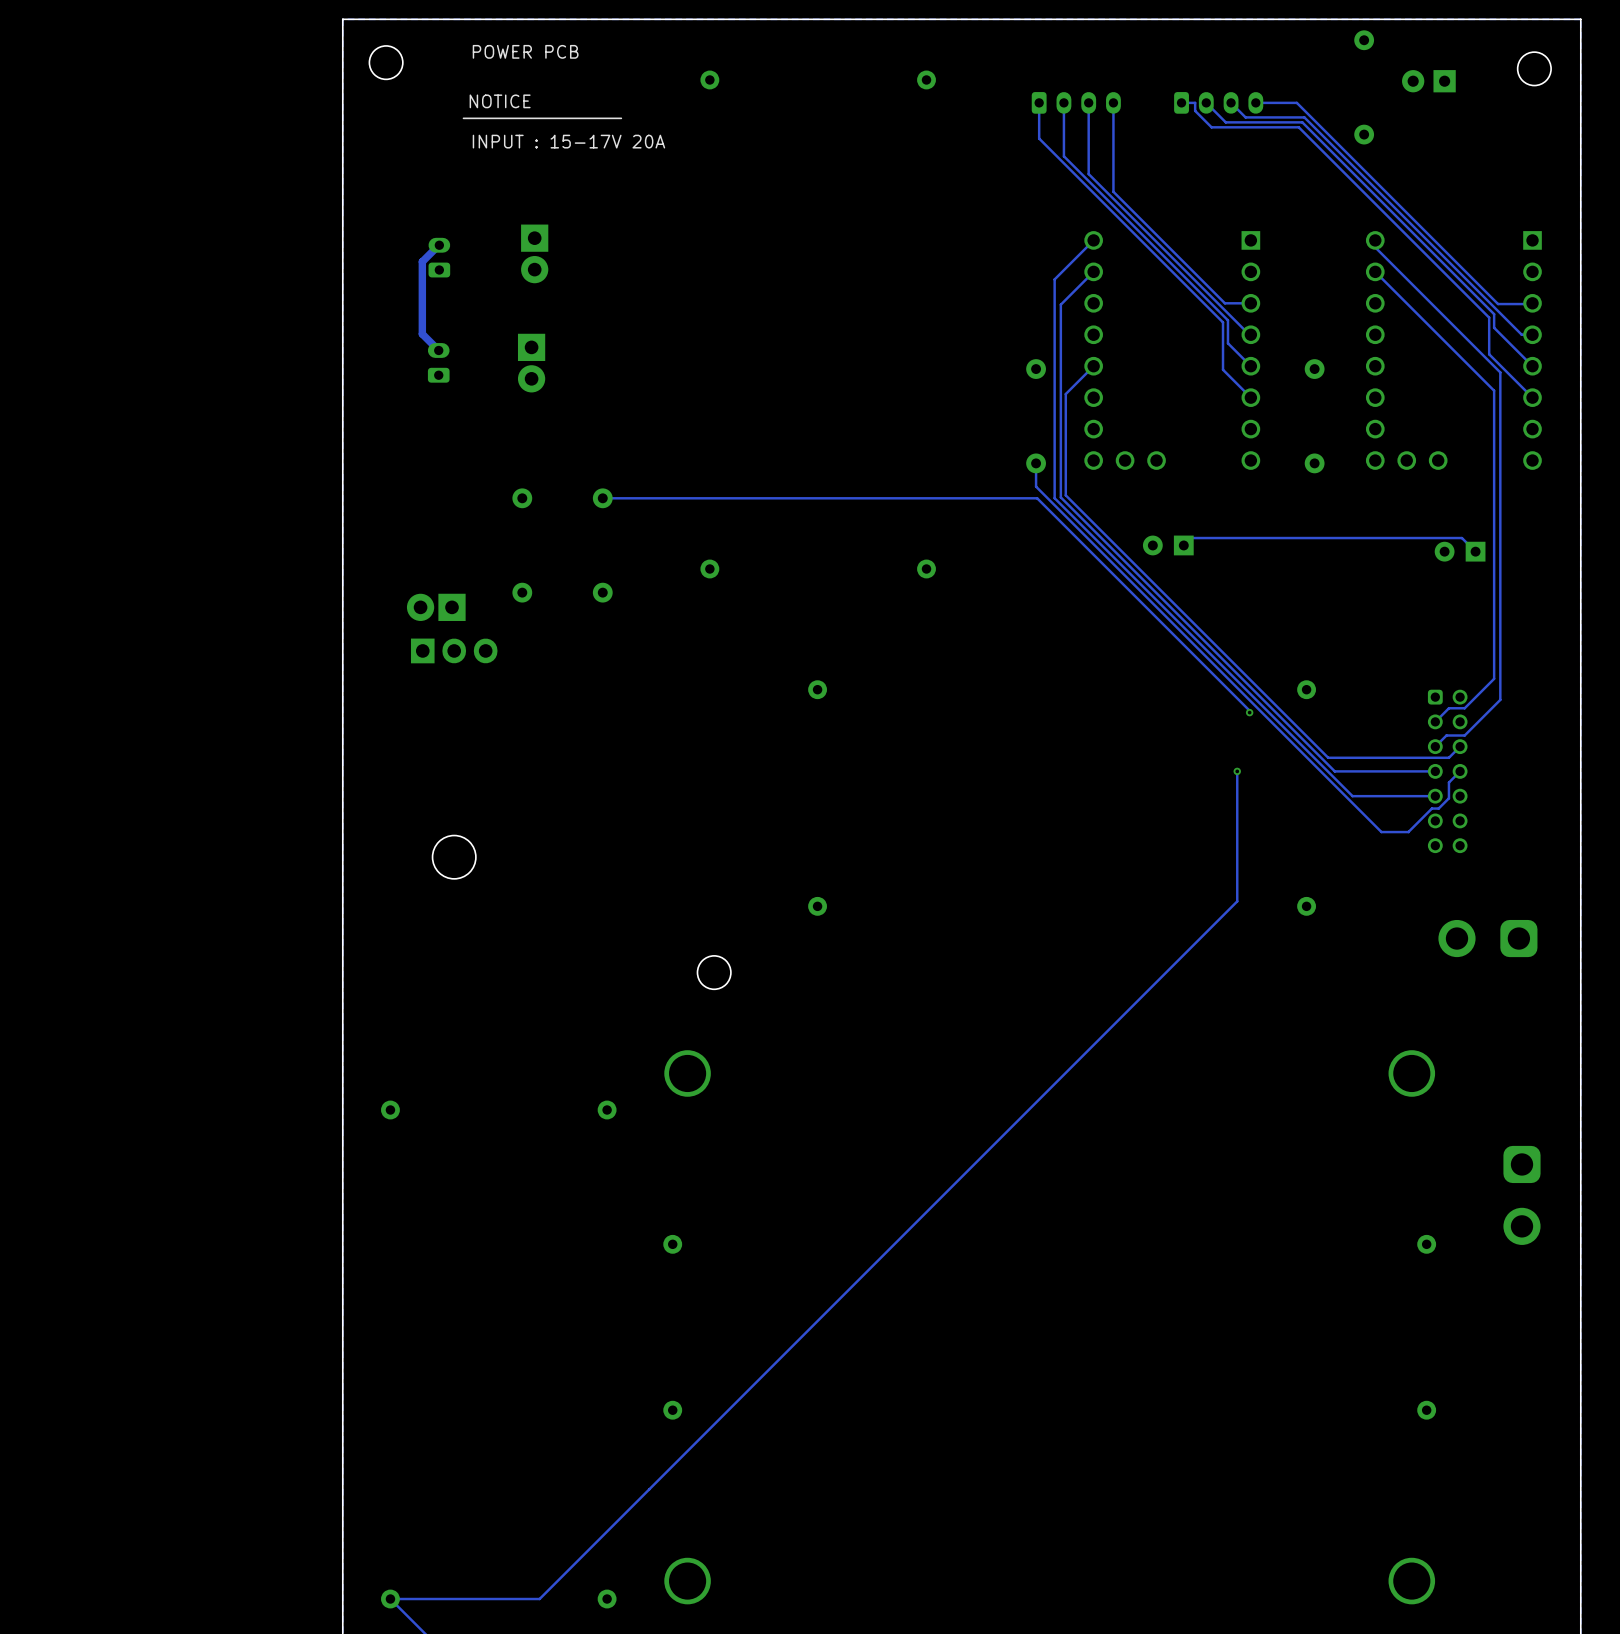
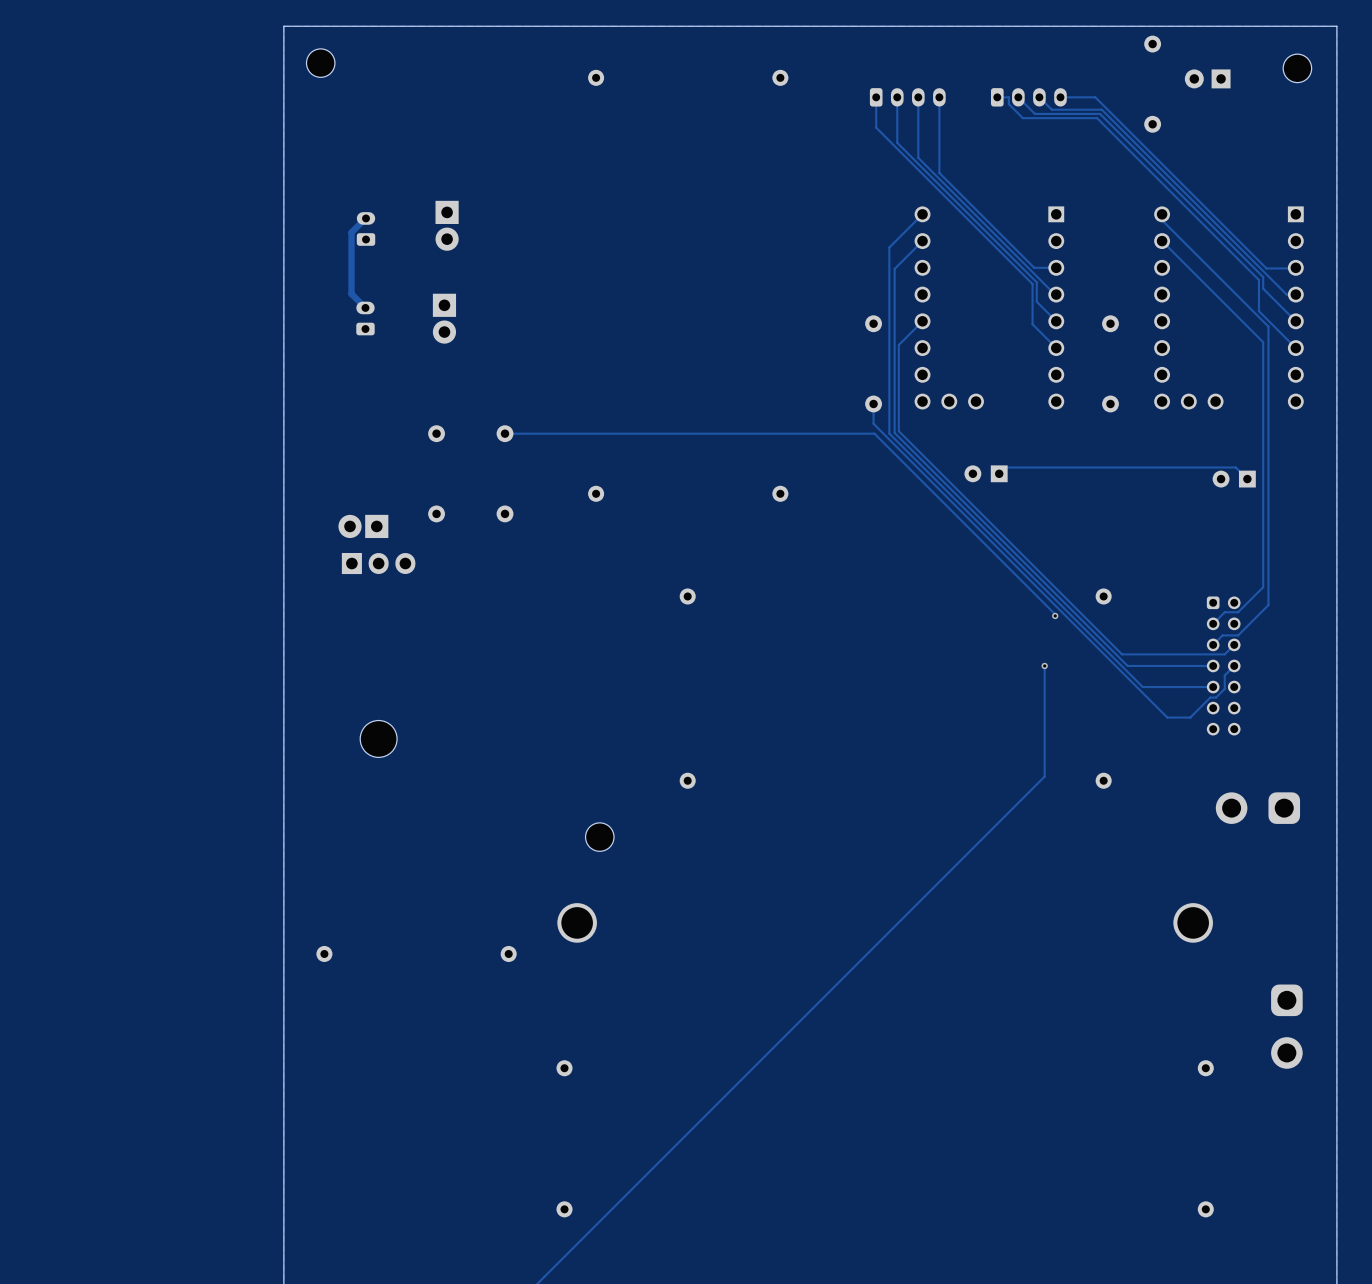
text: POWER PCB (525, 51) -> none
text: NOTICE (500, 101) -> none
line: (621, 118) (463, 118) -> none
text: INPUT : 15-17V 20A (568, 141) -> none

